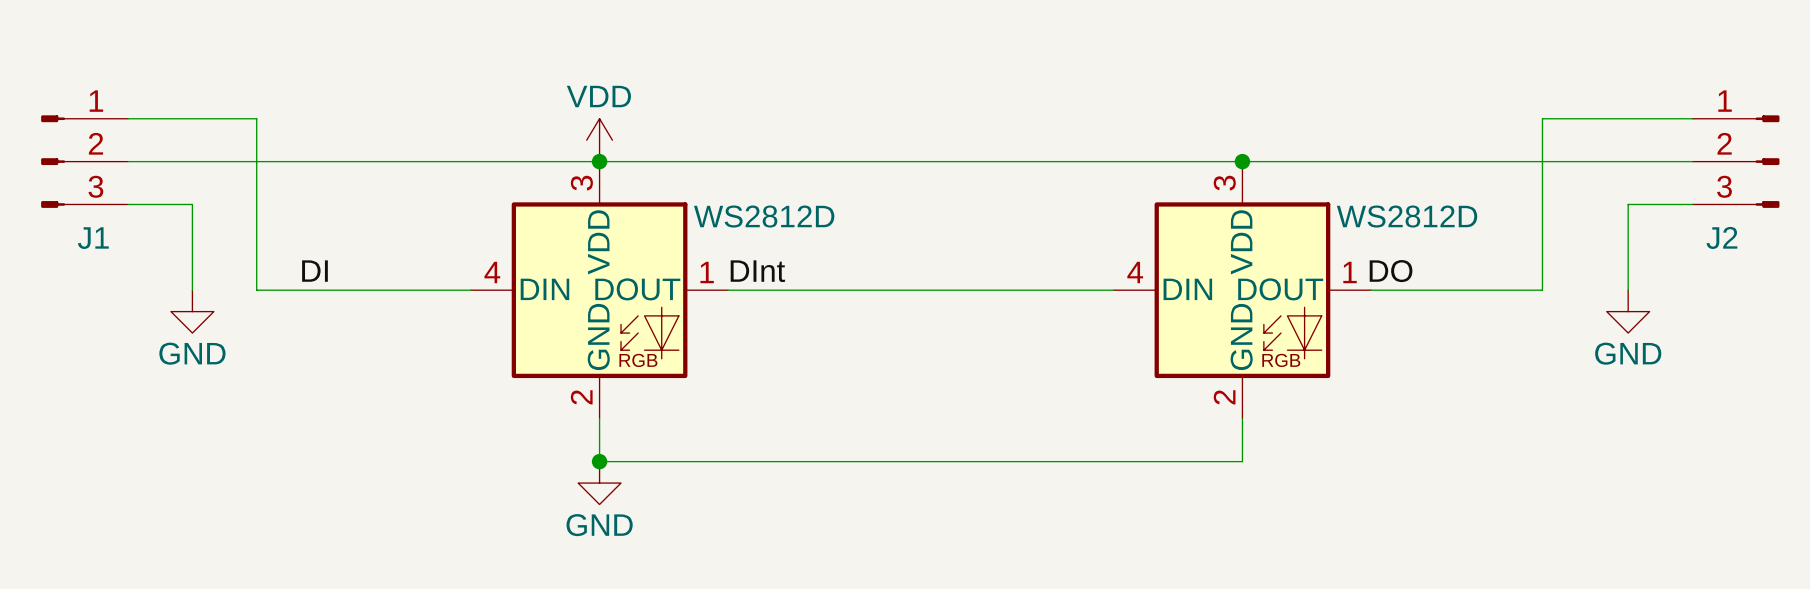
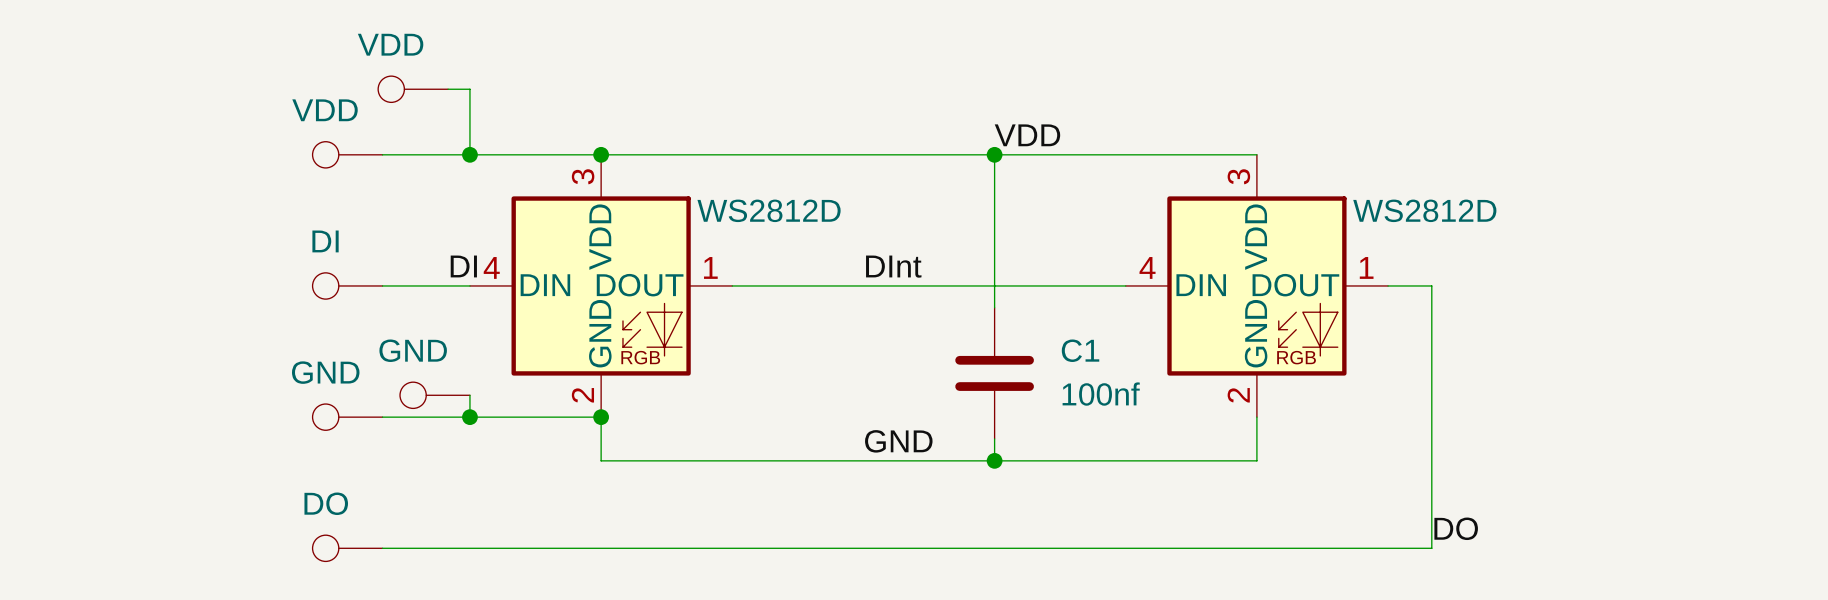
part: none -> VDD (413, 89)
wire: none -> (448, 89) (469, 89) (469, 154)
wire: (128, 118) (256, 118) (256, 290) (385, 290) -> none
wire: (1692, 118) (1542, 118) (1542, 290) (1413, 290) -> (382, 548) (1431, 548) (1431, 285)
power symbol: VDD (599, 140) -> none
label: none -> VDD (1027, 135)
J1: (84, 161) -> none
wire: (128, 161) (385, 161) -> none
part: none -> VDD (347, 154)
junction: none -> (469, 154)
wire: none -> (994, 154) (994, 307)
junction: none -> (994, 154)
wire: (1242, 161) (1692, 161) -> none
junction: (1242, 161) -> none
J2: (1735, 161) -> none
wire: (128, 204) (192, 204) (192, 290) -> none
wire: (1692, 204) (1628, 204) (1628, 290) -> none
label position: DI (314, 271) -> DI (463, 266)
label position: DInt (757, 271) -> DInt (893, 266)
label position: DO (1391, 271) -> DO (1456, 528)
part: none -> DI (347, 285)
power symbol: GND (192, 311) -> none
power symbol: GND (1628, 311) -> none
C1: none -> 100nf (994, 373)
part: none -> GND (434, 395)
wire: none -> (469, 395) (469, 417)
part: none -> GND (347, 417)
wire: none -> (382, 417) (601, 417)
junction: none -> (469, 417)
wire: none -> (994, 439) (994, 460)
label: none -> GND (898, 441)
junction position: (599, 461) -> (601, 417)
junction: none -> (994, 460)
power symbol: GND (599, 483) -> none
part: none -> DO (347, 548)

